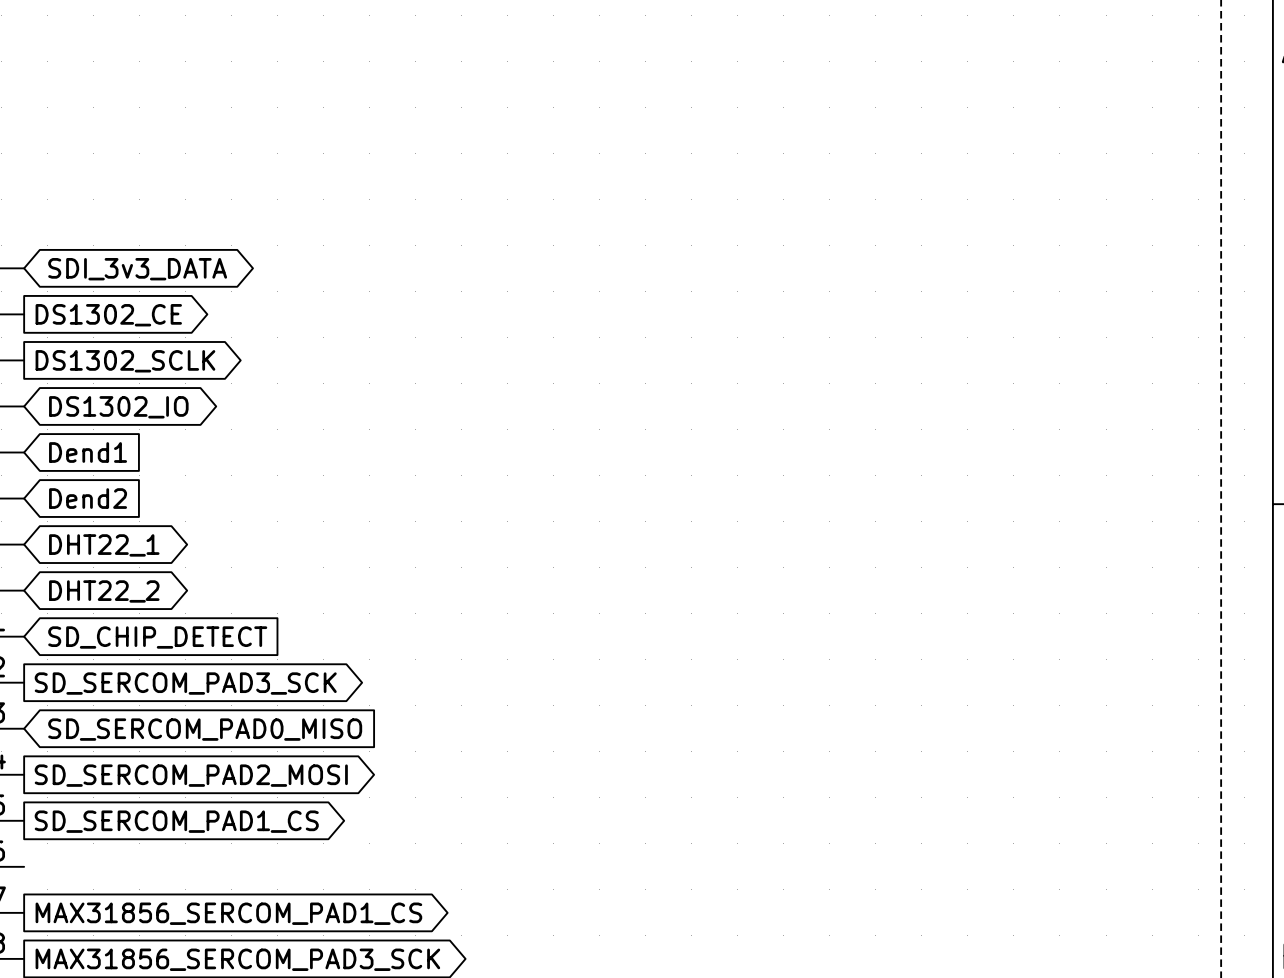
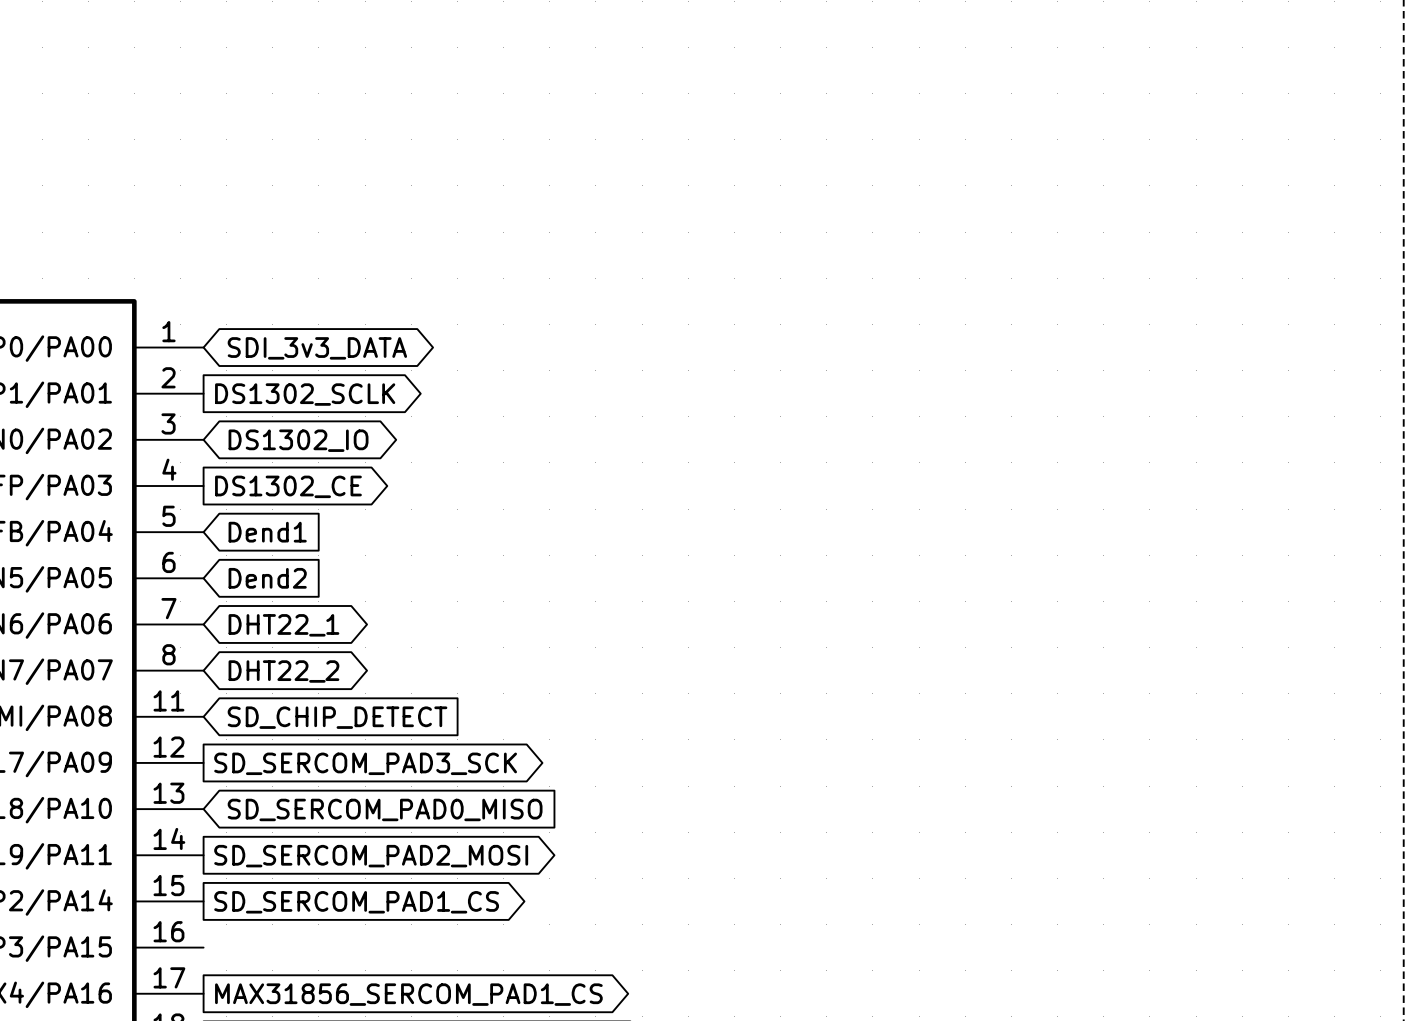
global label: DS1302_CE (108, 315) -> DS1302_SCLK (305, 394)
global label shape: output (125, 361) -> bidirectional (298, 440)
global label: DS1302_SCLK (125, 361) -> DS1302_IO (298, 440)
global label shape: bidirectional (118, 407) -> output (288, 486)
global label: DS1302_IO (118, 407) -> DS1302_CE (288, 486)

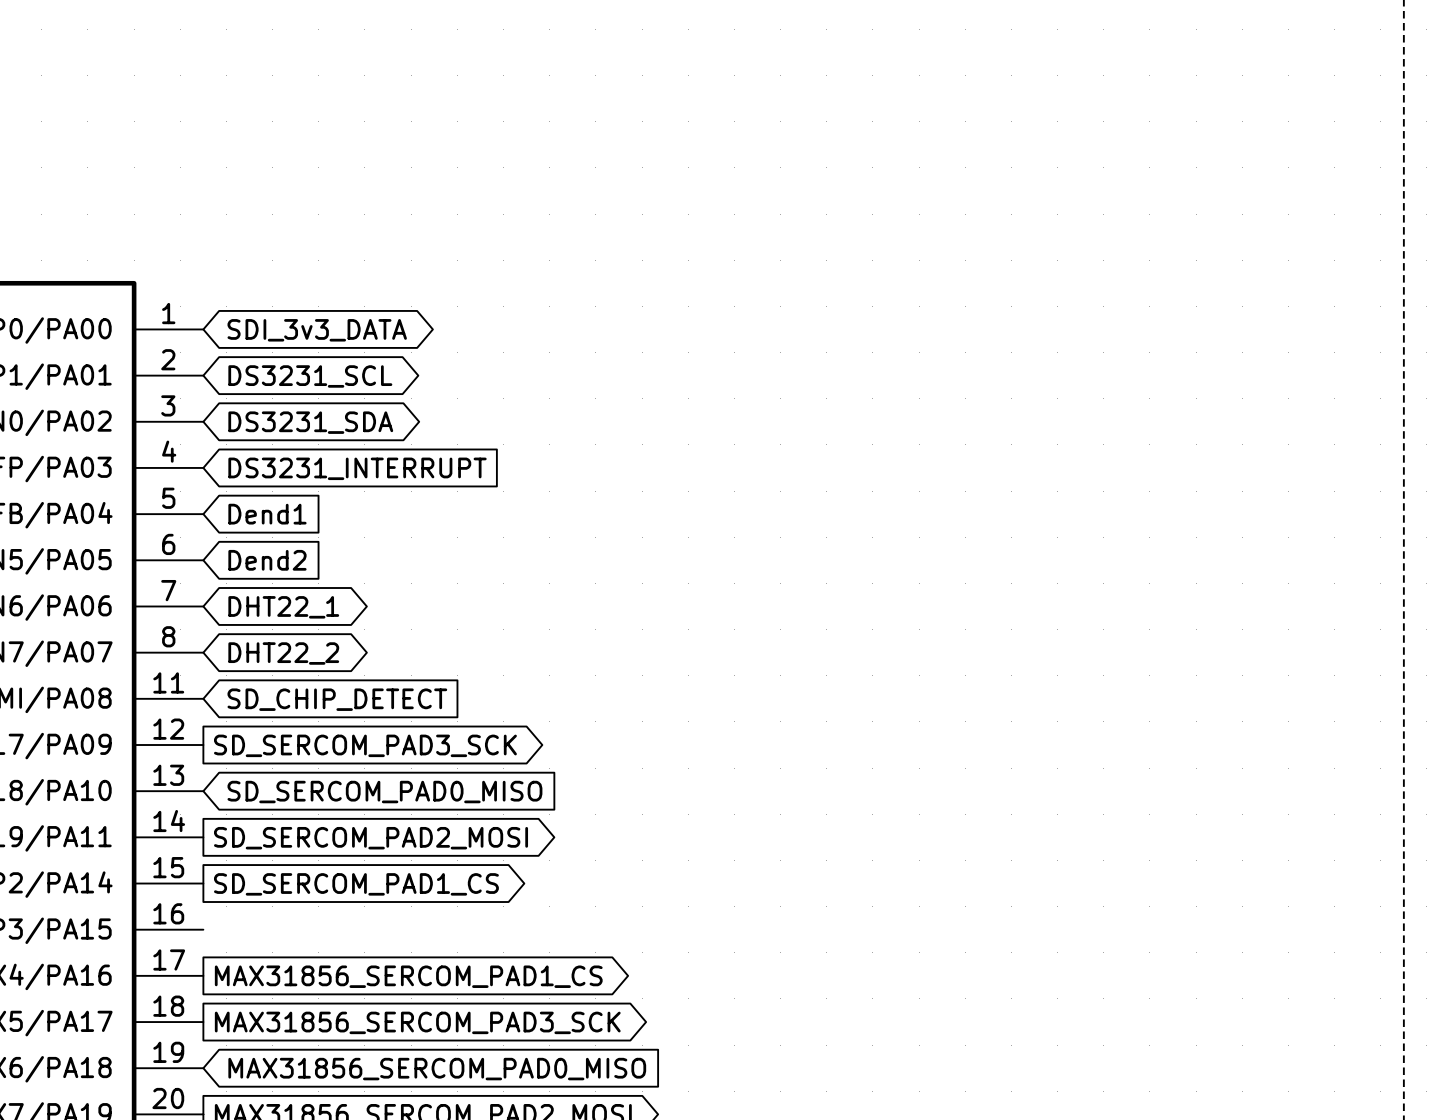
global label shape: output (305, 394) -> bidirectional (310, 376)
global label: DS1302_SCLK (305, 394) -> DS3231_SCL (310, 376)
global label: DS1302_IO (298, 440) -> DS3231_SDA (310, 422)
global label shape: output (288, 486) -> input (357, 468)
global label: DS1302_CE (288, 486) -> DS3231_INTERRUPT (357, 468)

